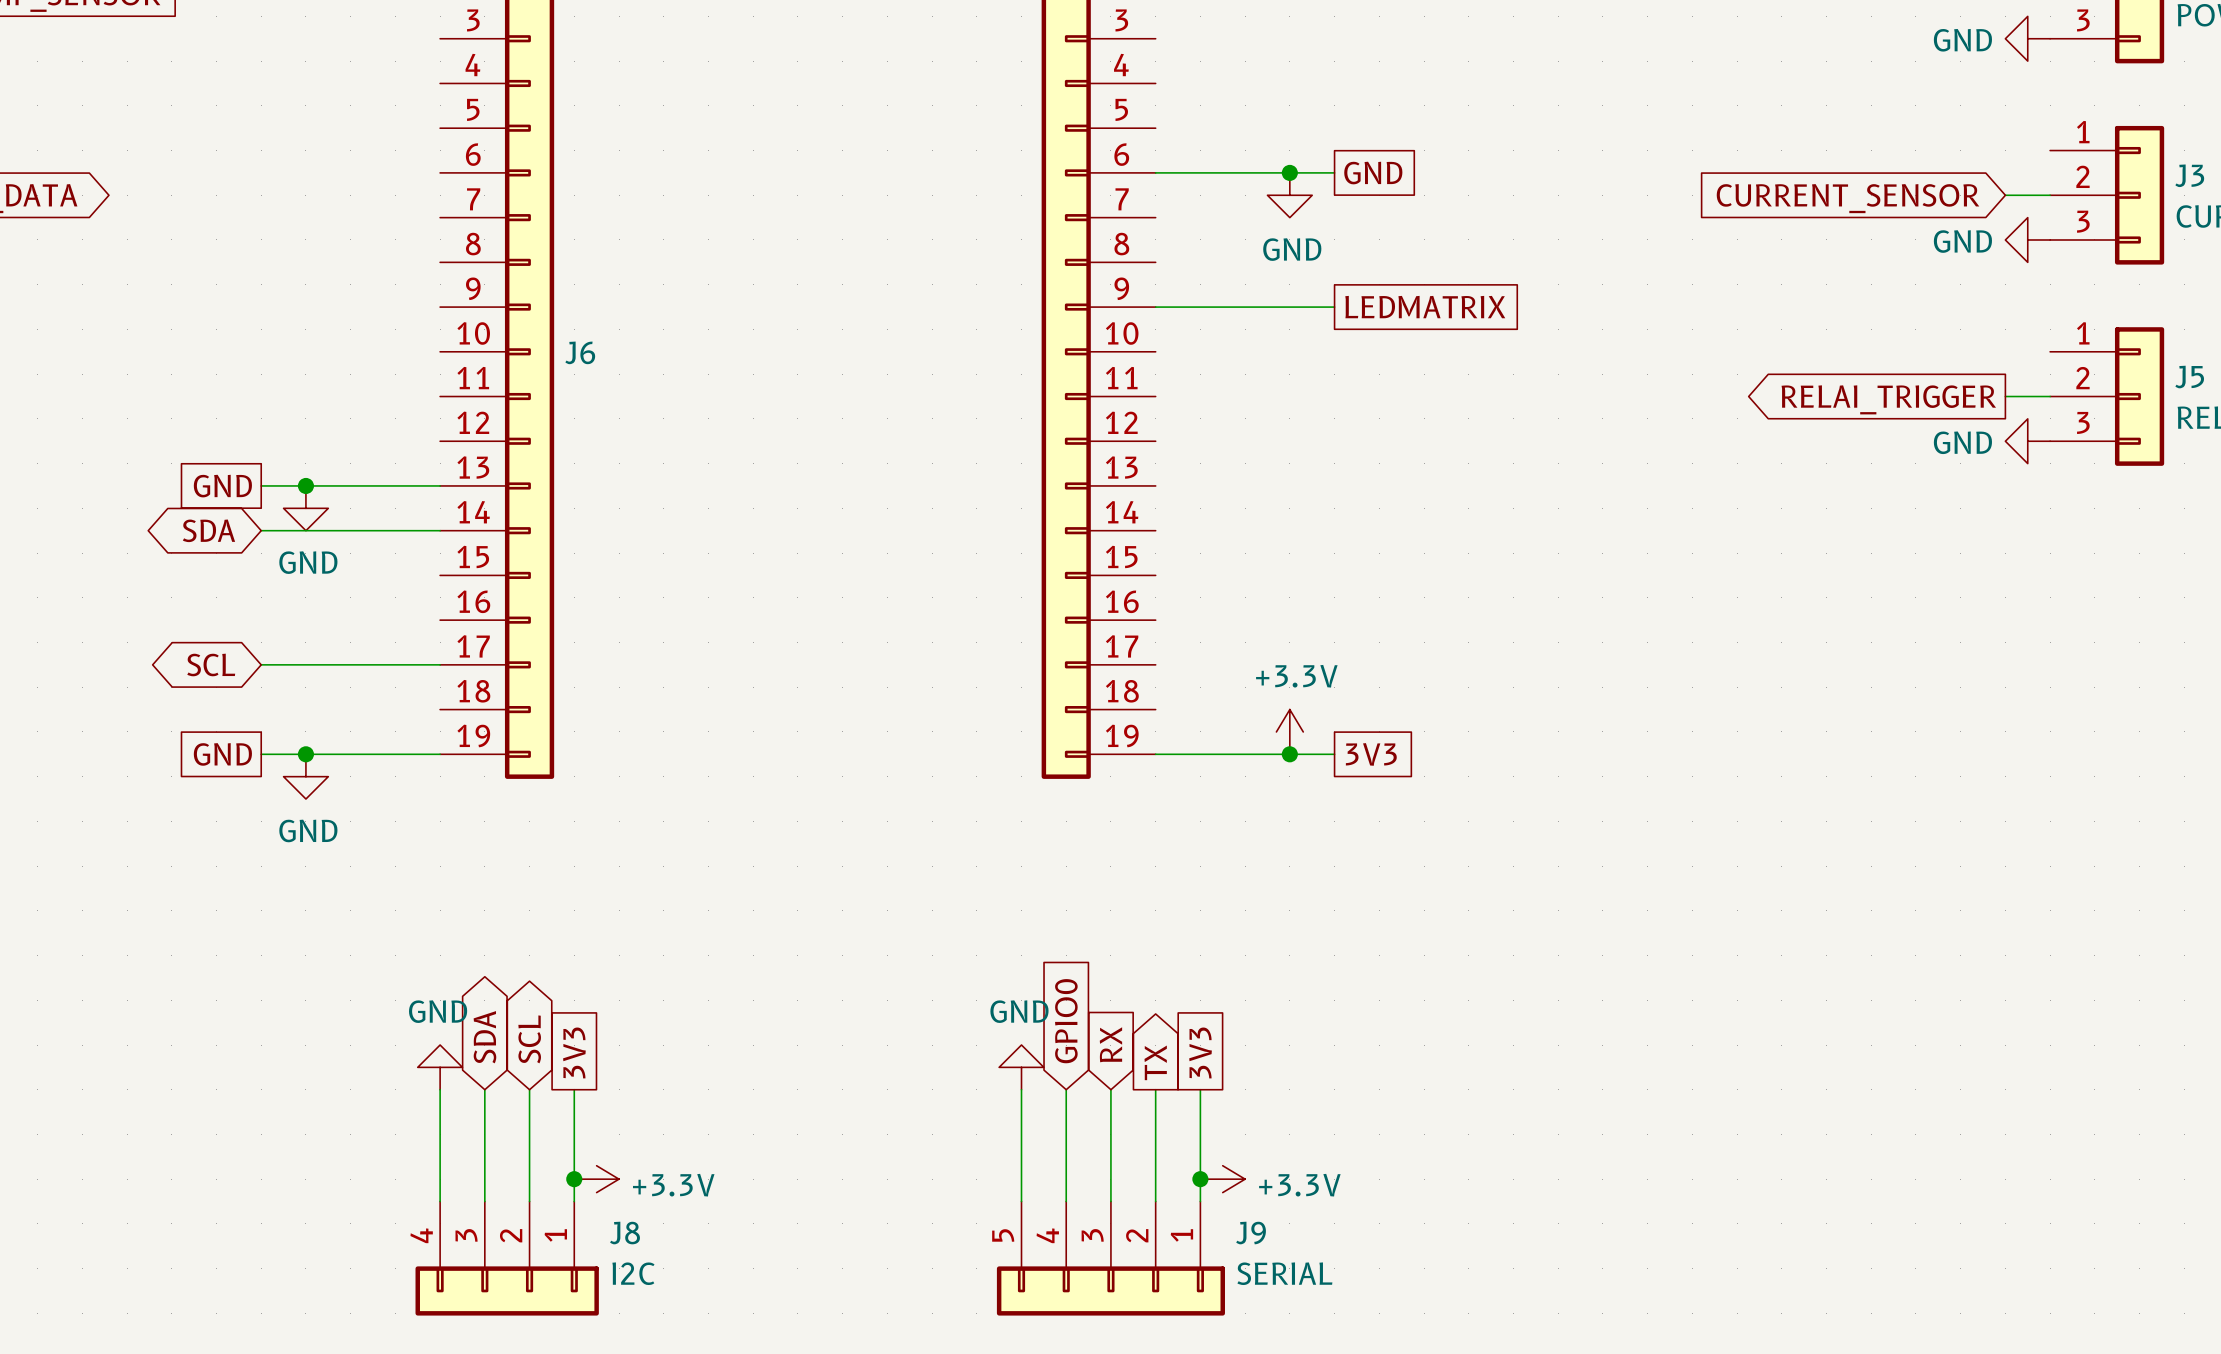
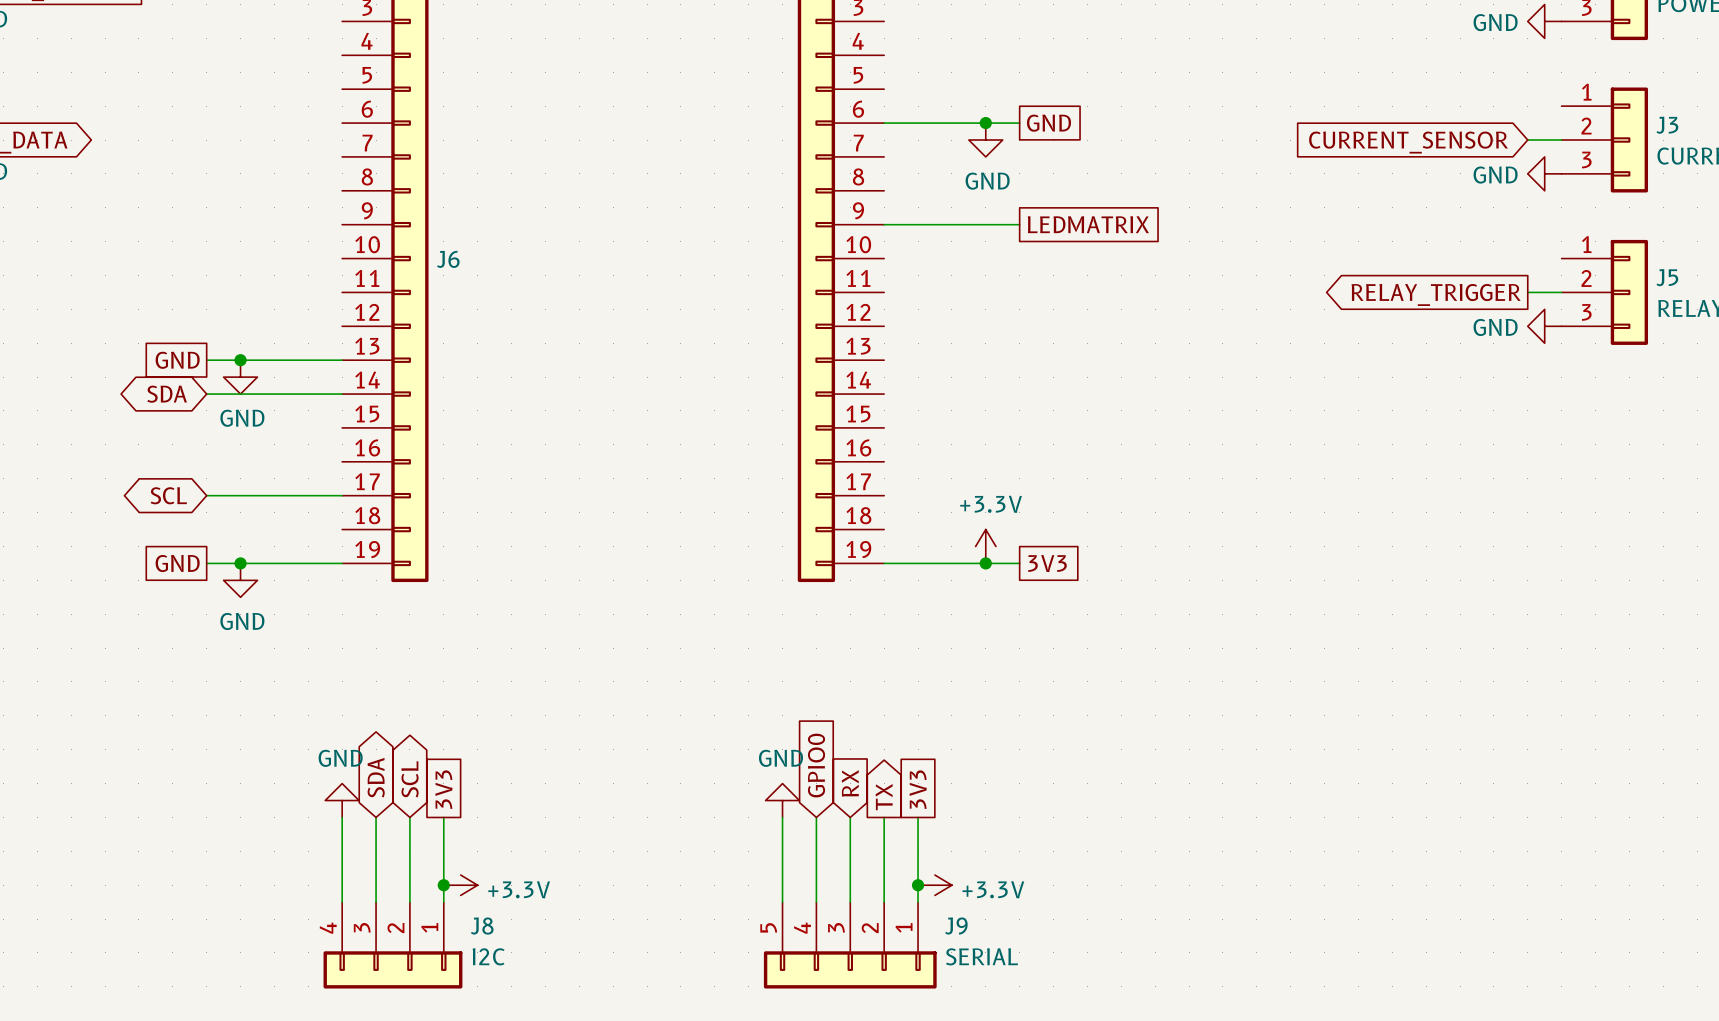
global label: RELAI_TRIGGER (1888, 399) -> RELAY_TRIGGER (1436, 294)

